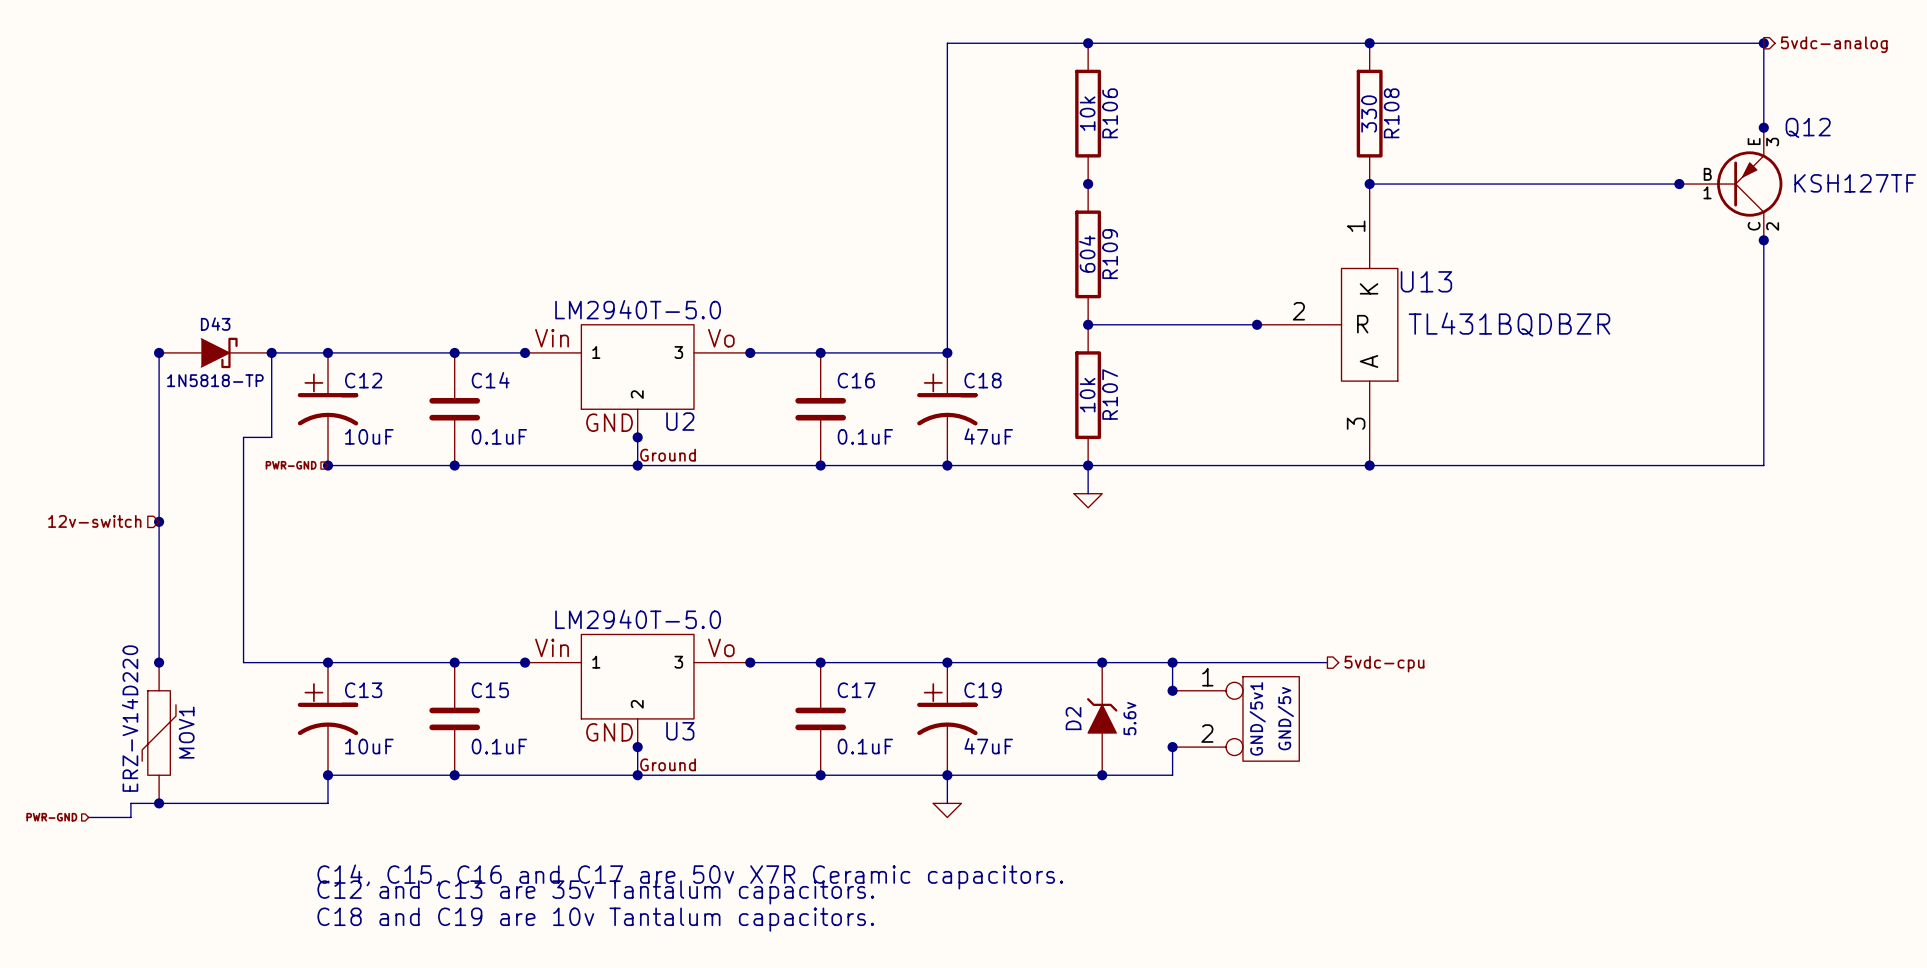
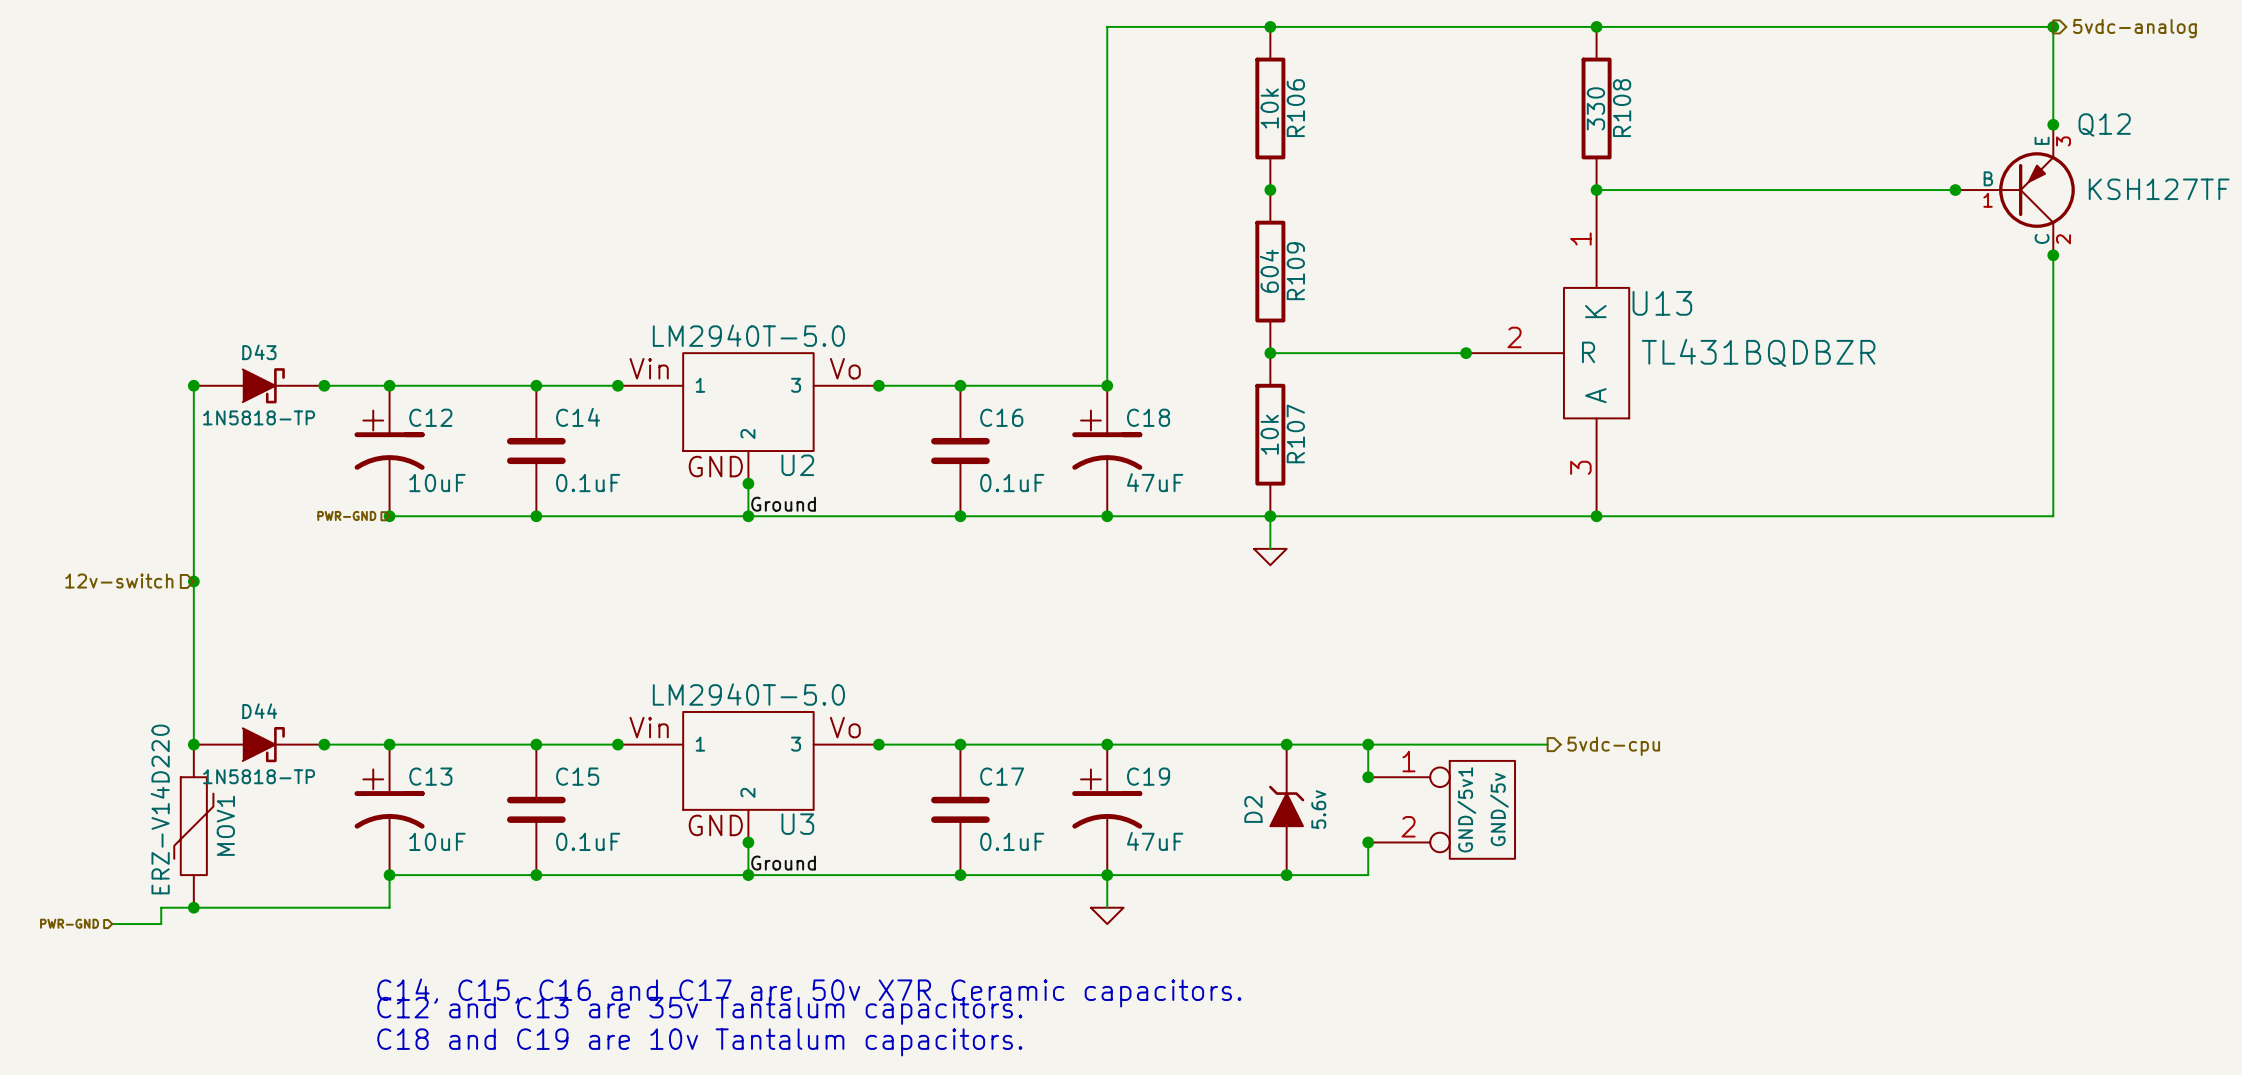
wire: (271, 352) (271, 437) (243, 437) (243, 662) (271, 662) -> none
D44: none -> 1N5818-TP (259, 744)
junction: none -> (324, 744)

